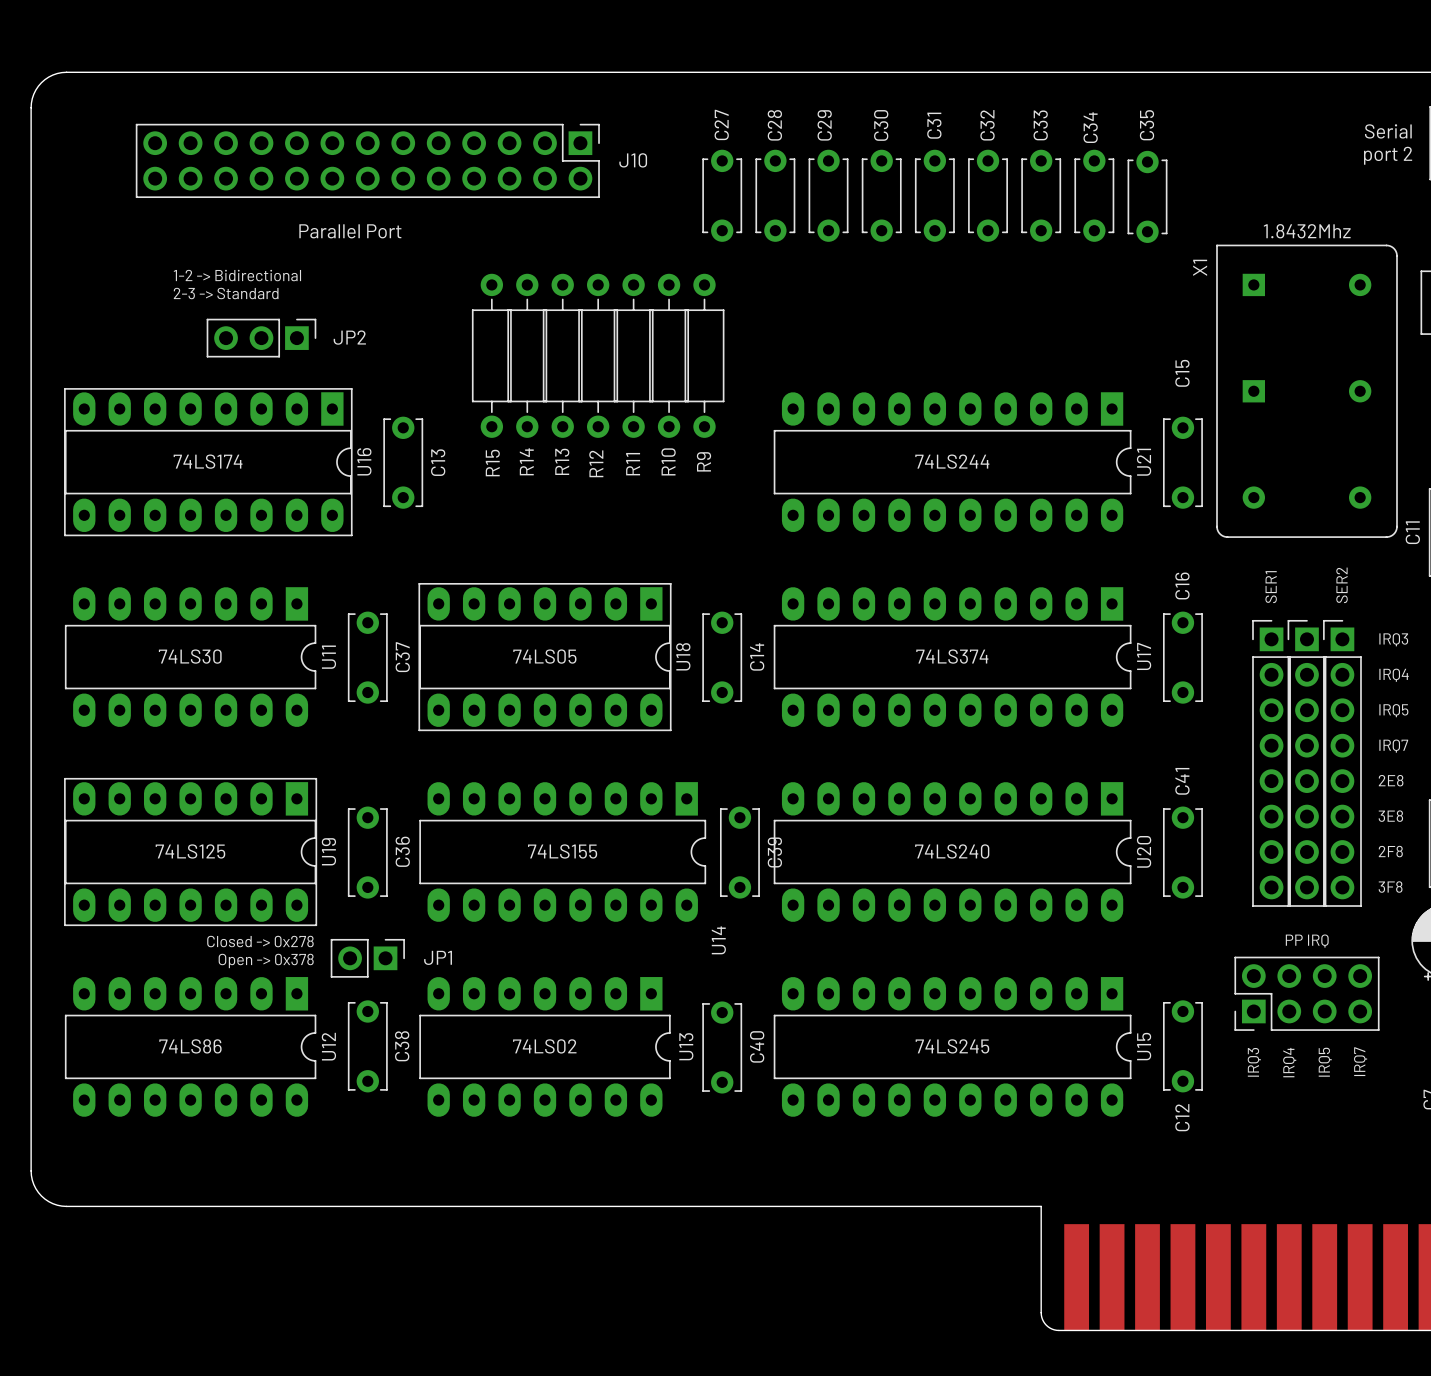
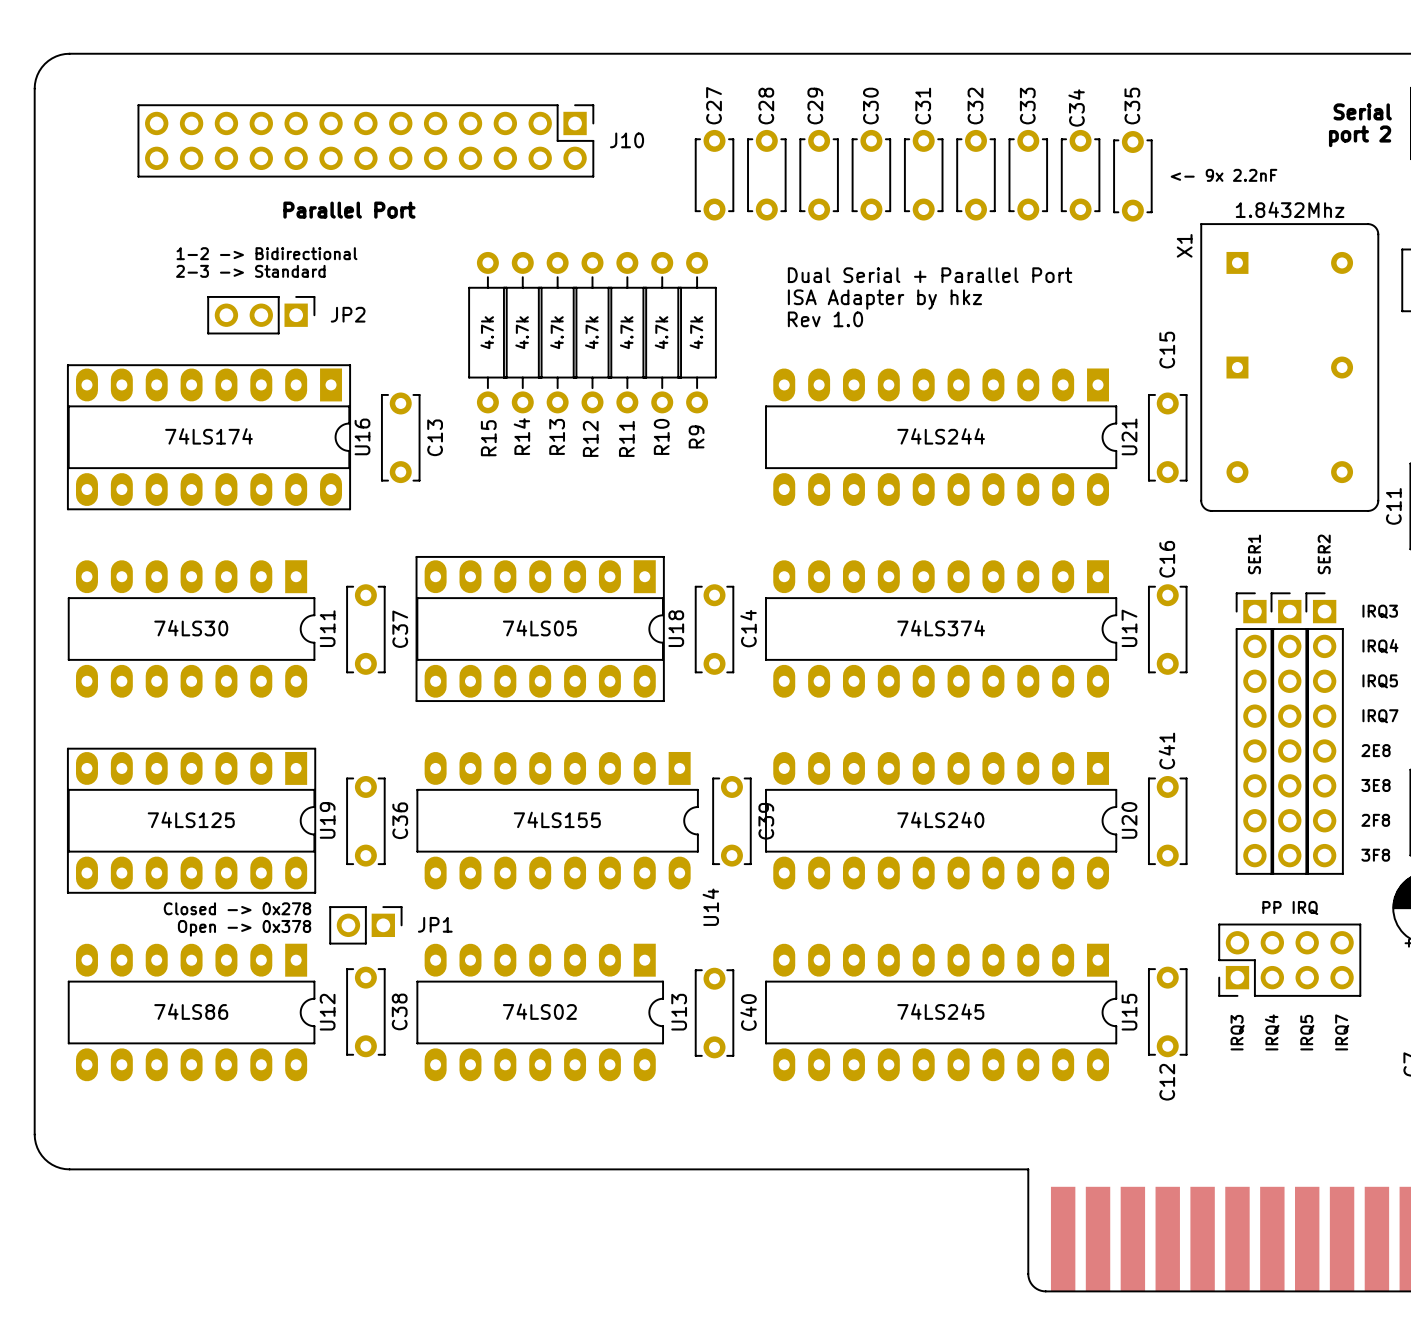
text: none -> <- 9x 2.2nF (1224, 175)
text: none -> Dual Serial + Parallel Port (930, 275)
text: none -> ISA Adapter by hkz (884, 299)
text: none -> Rev 1.0 (825, 319)
text: none -> 4.7k (487, 332)
text: none -> 4.7k (522, 332)
text: none -> 4.7k (556, 332)
text: none -> 4.7k (591, 332)
text: none -> 4.7k (626, 332)
text: none -> 4.7k (661, 332)
text: none -> 4.7k (696, 332)

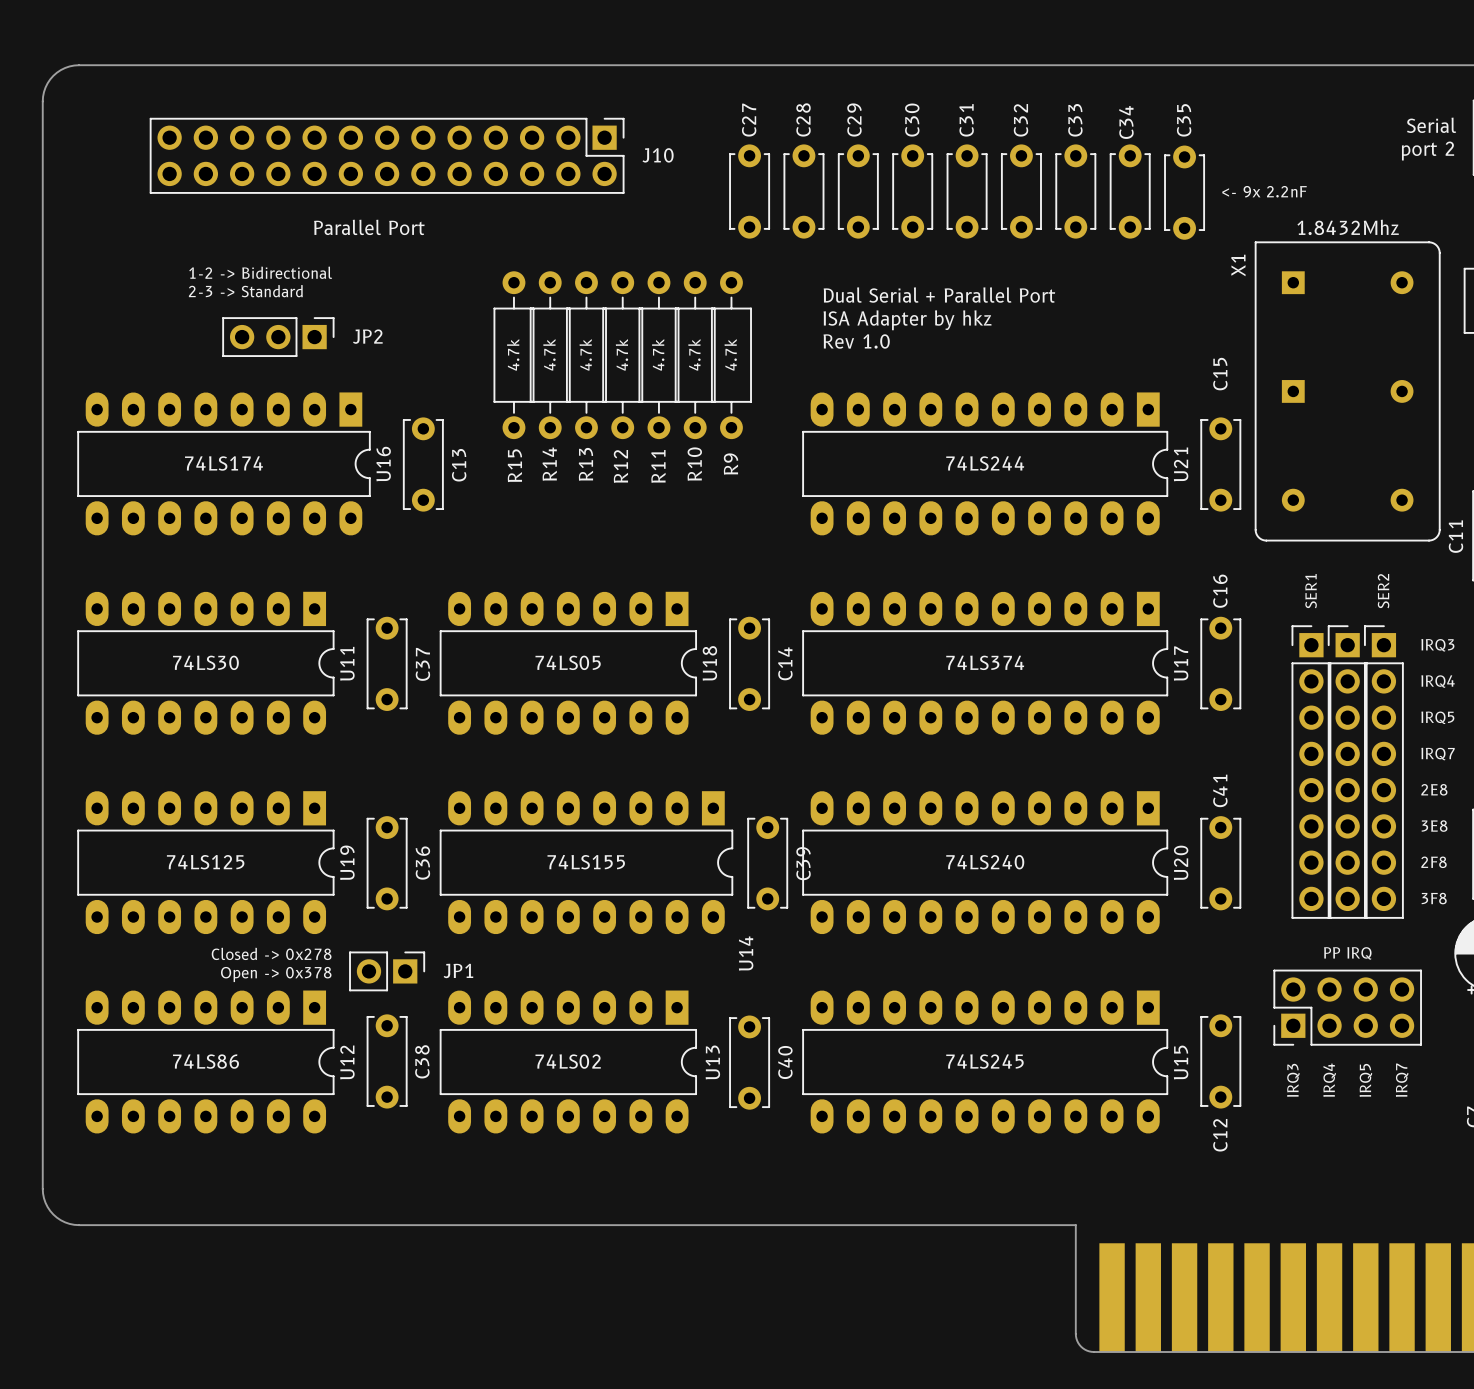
U16 footprint: [67, 364, 351, 511] -> [77, 392, 371, 536]
U18 footprint: [415, 556, 665, 702] -> [439, 591, 697, 735]
U19 footprint: [67, 747, 317, 894] -> [77, 791, 335, 935]

